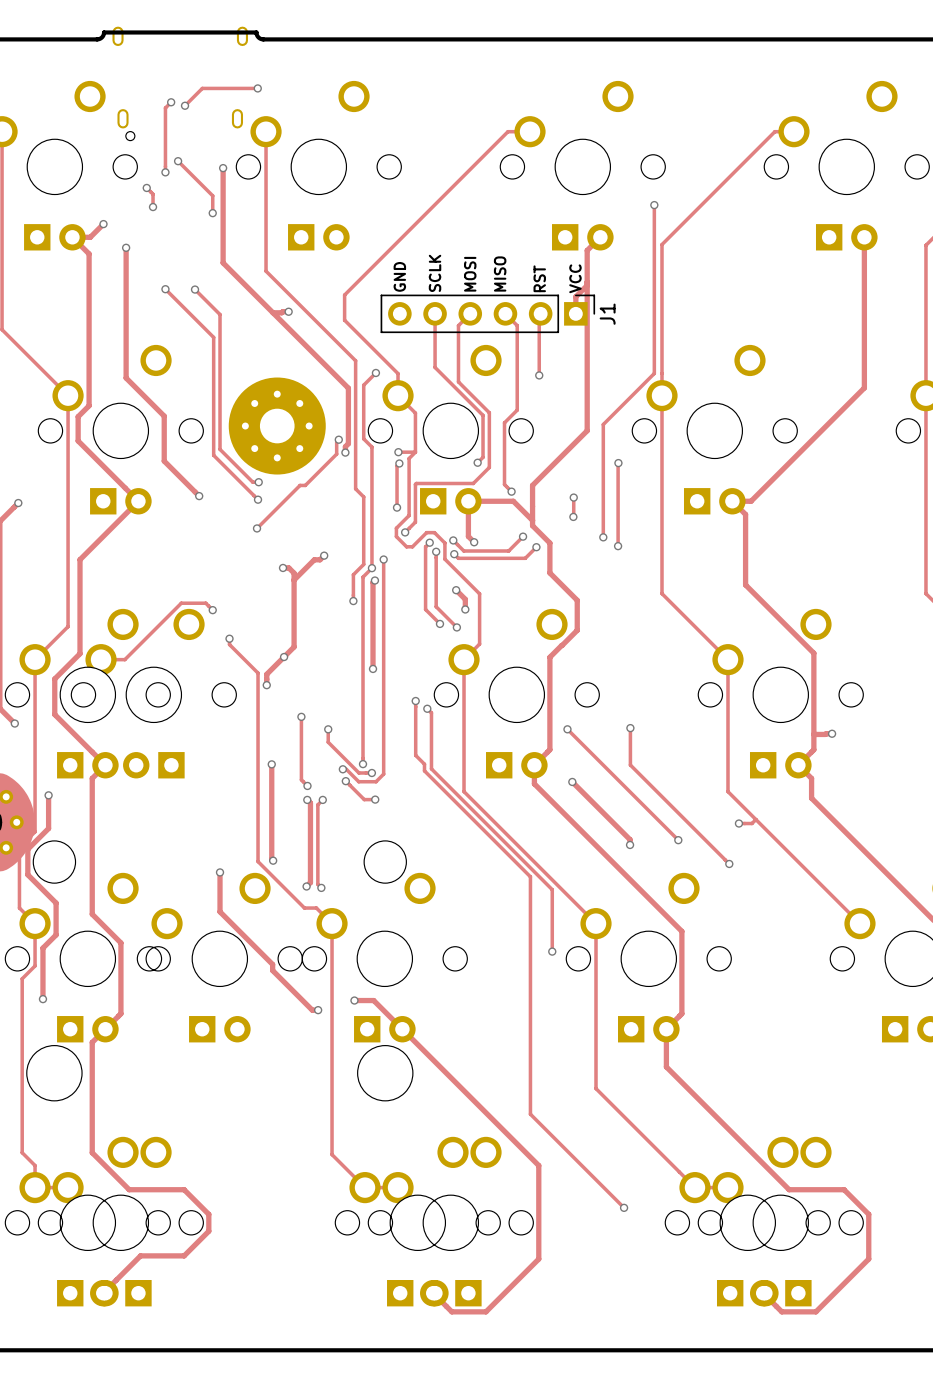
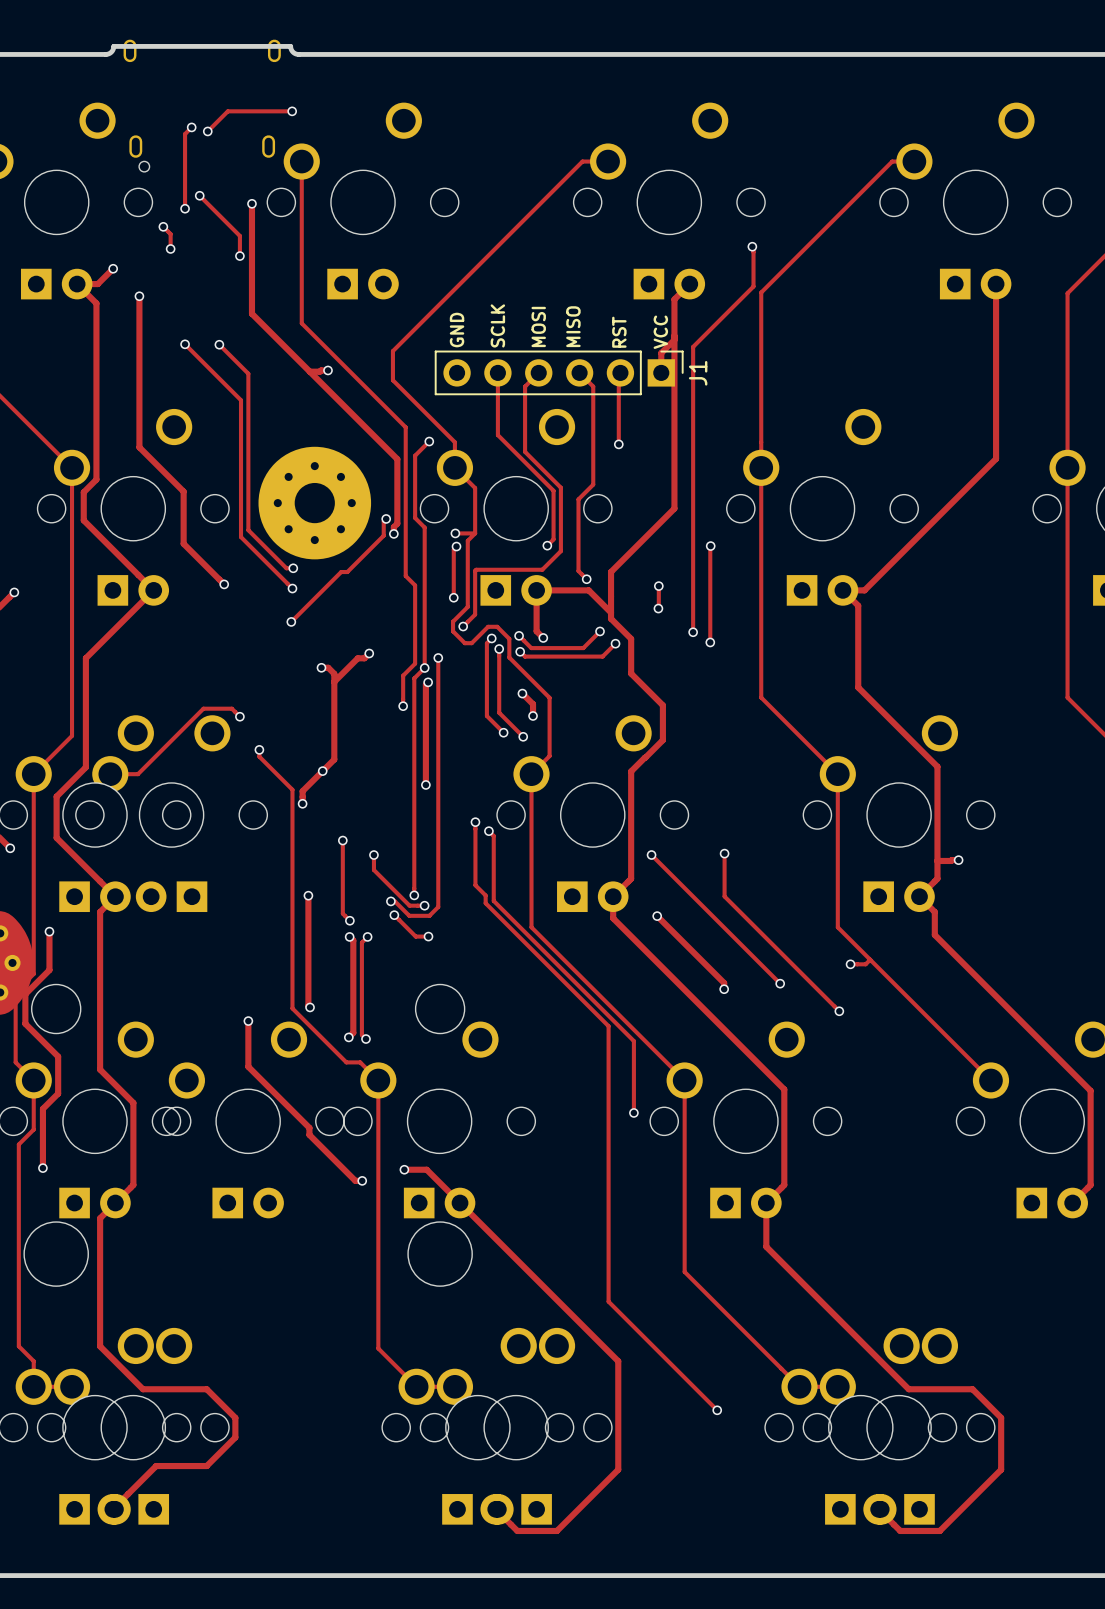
track: (654, 205) (654, 373) (603, 424) -> (753, 245) (753, 286) (693, 346) (693, 501)

